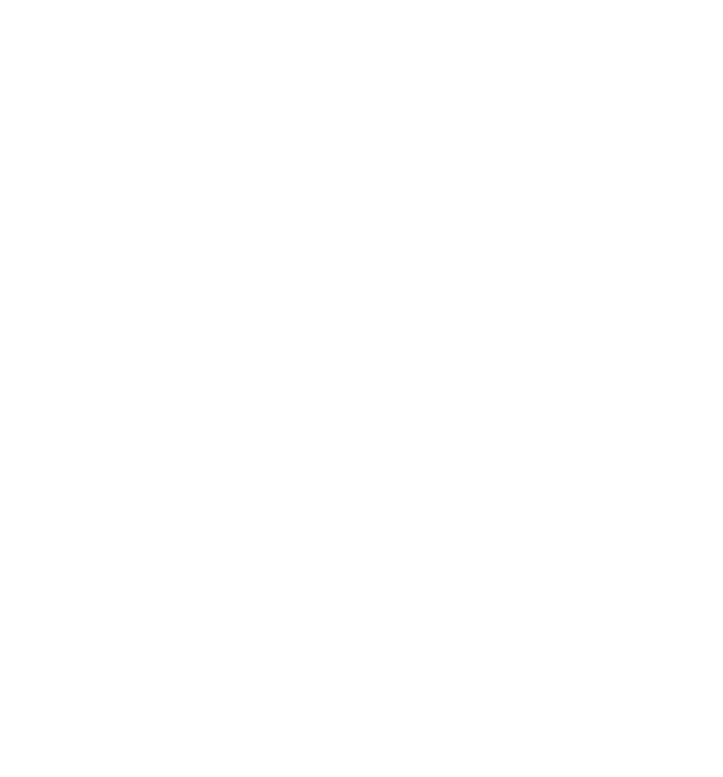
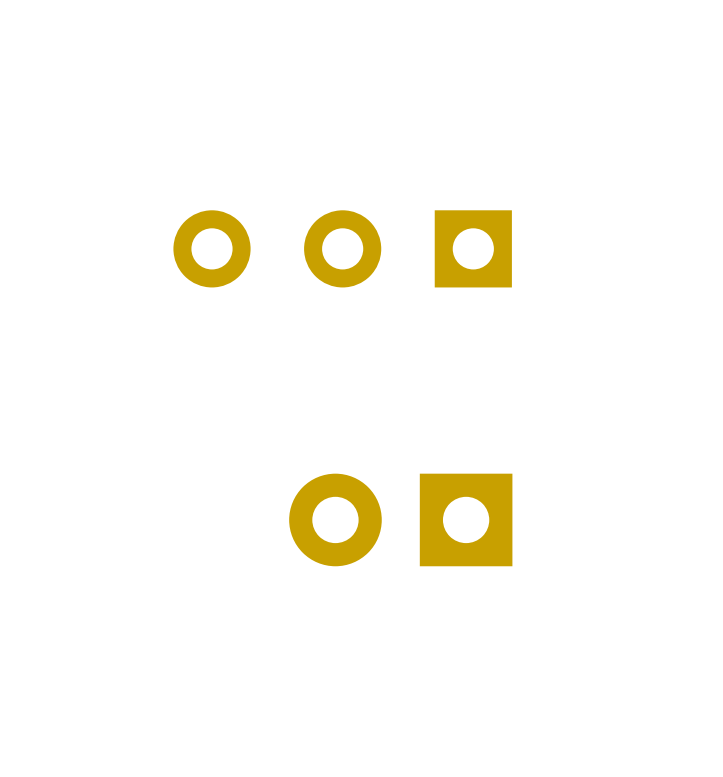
part: none -> (342, 248)
part: none -> (400, 519)

